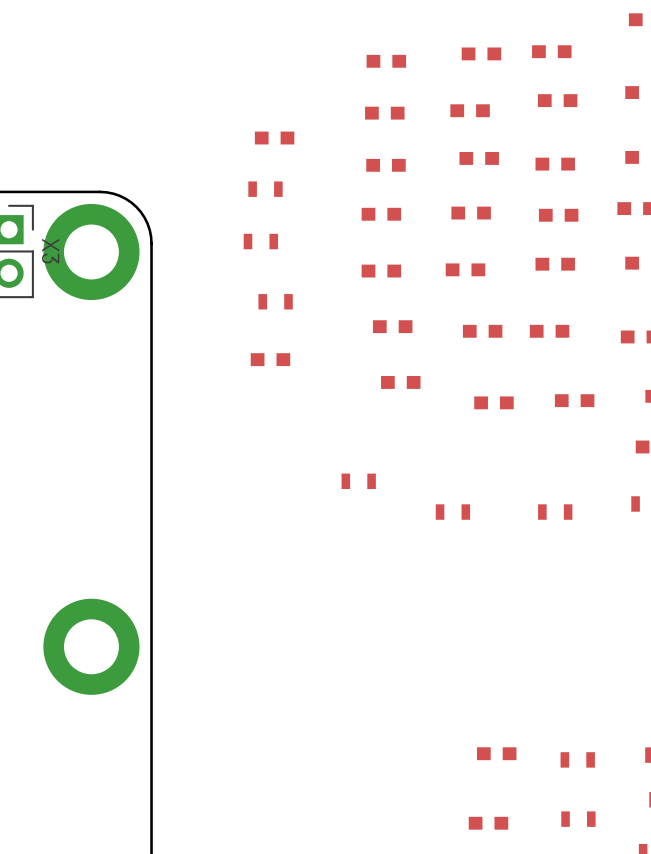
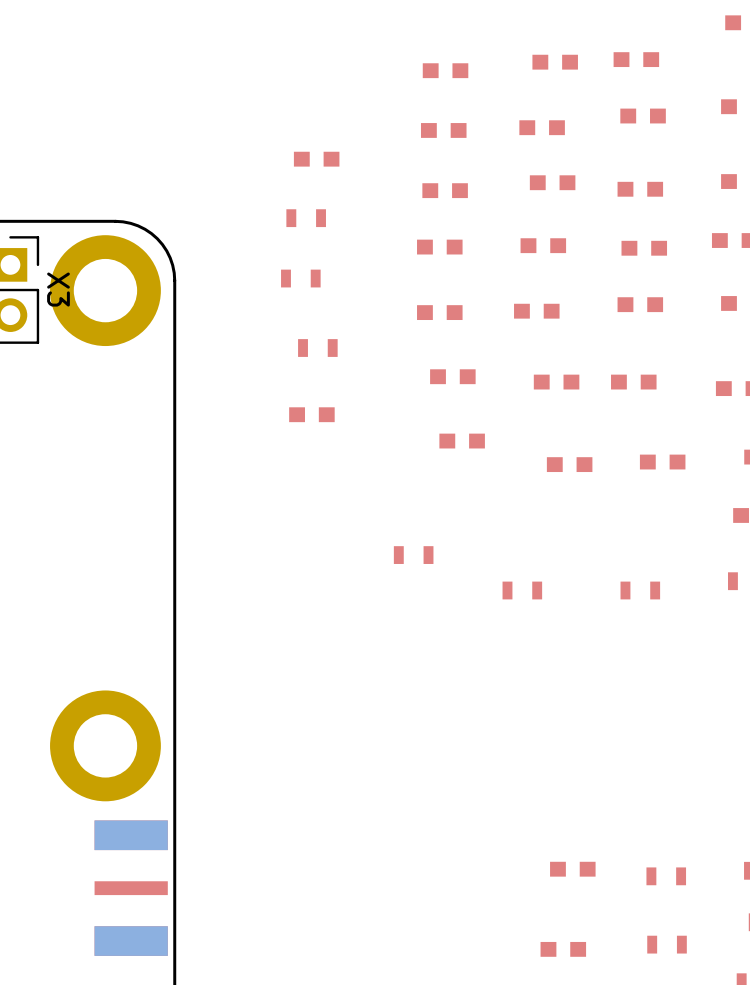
part: none -> (131, 888)

